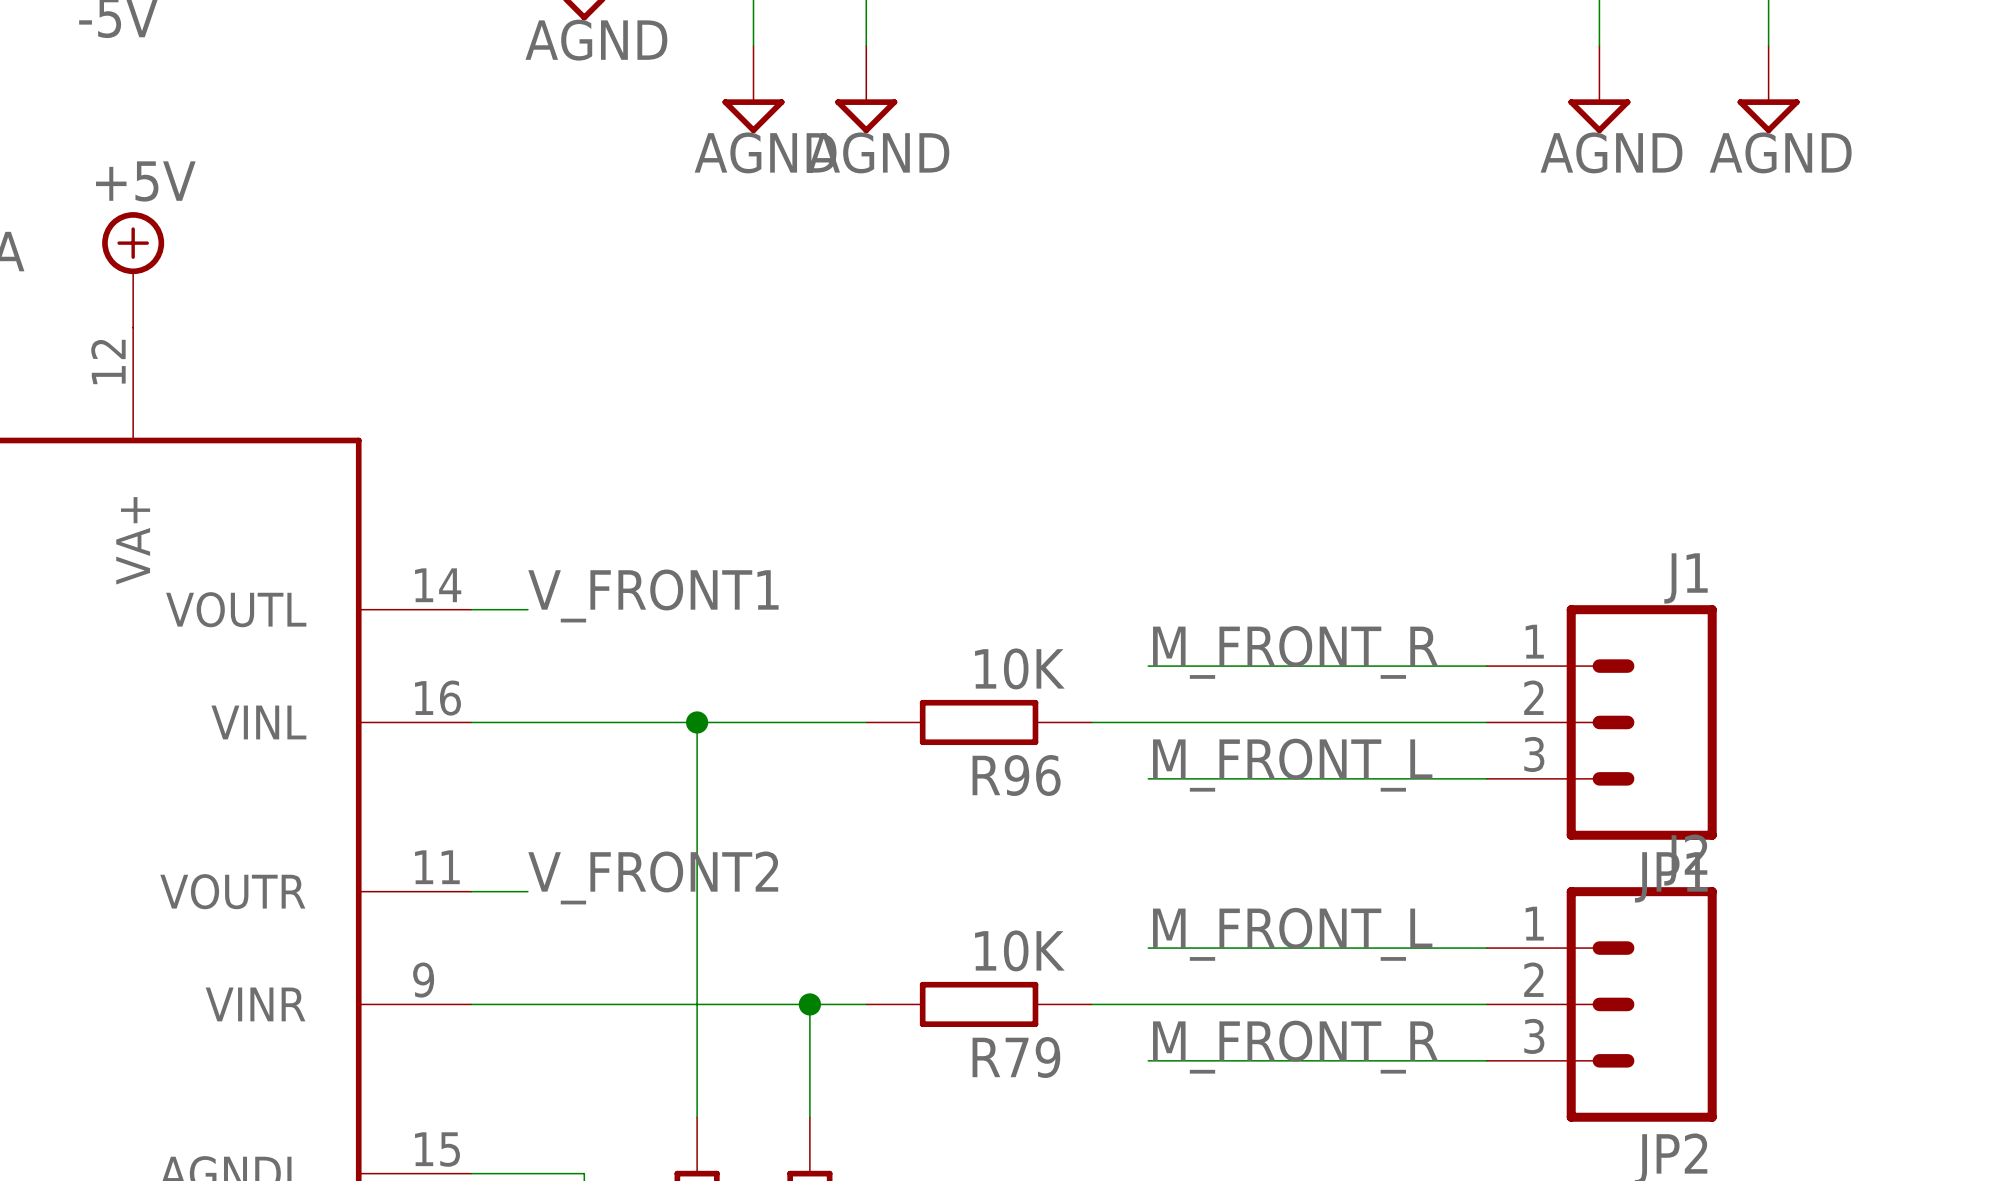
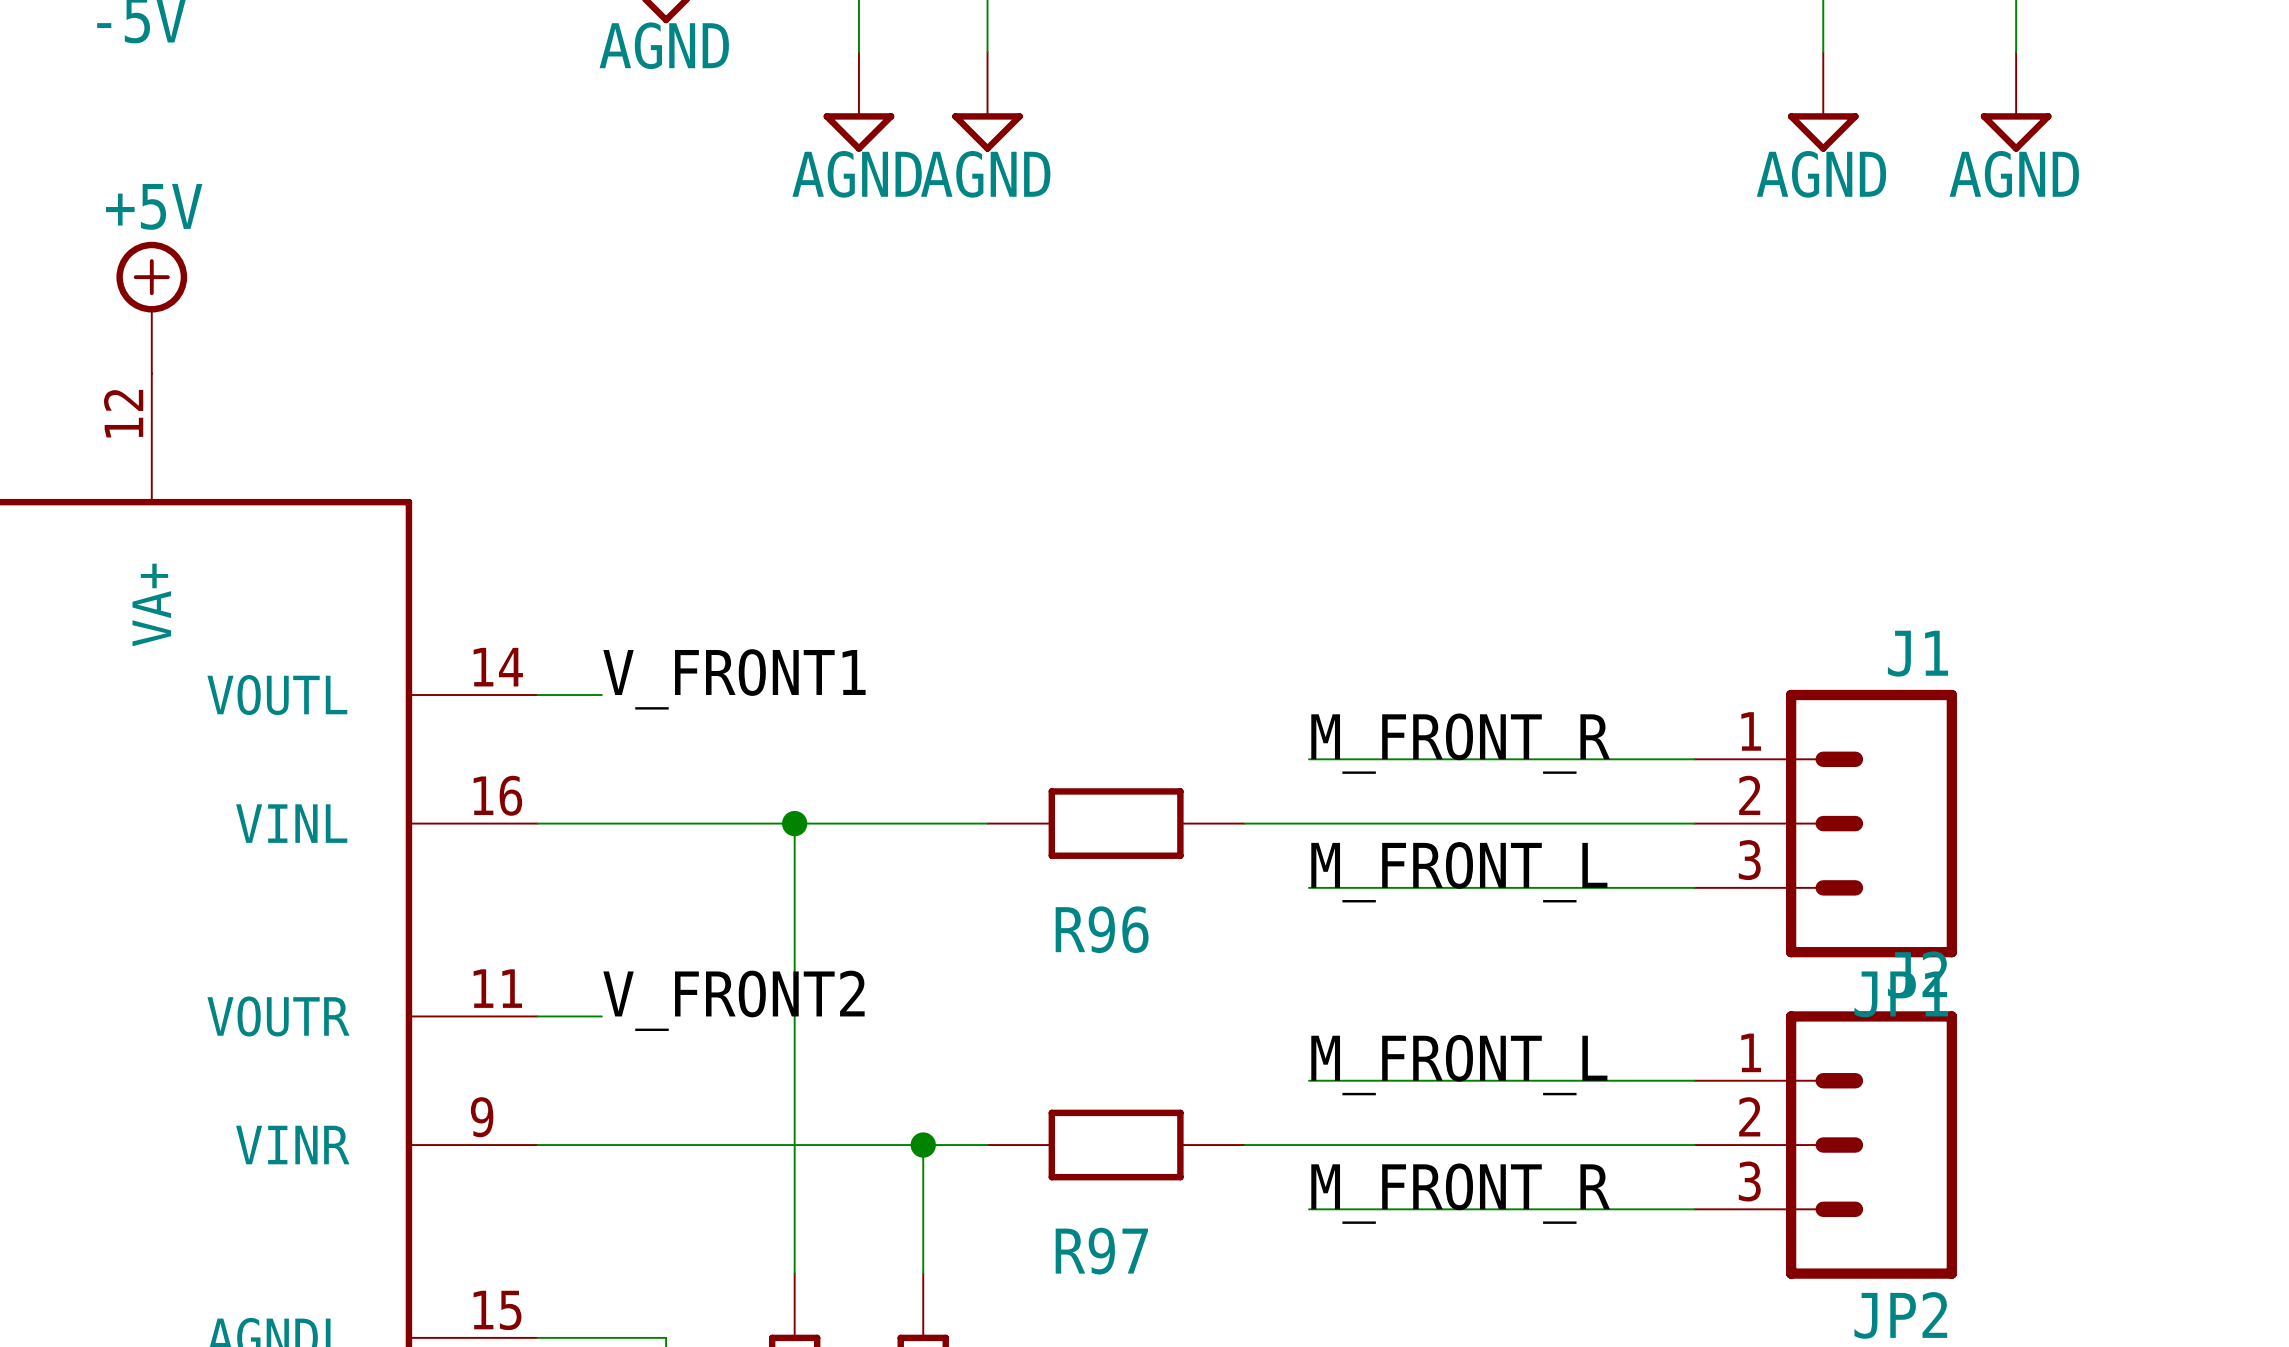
R96 value: 10K (1019, 668) -> none
R96 symbol: [866, 699, 1092, 746] -> [987, 788, 1245, 859]
R96 name position: R96 (1016, 775) -> R96 (1102, 929)
R79: 10K (979, 1004) -> none
R97: none -> (1116, 1145)

